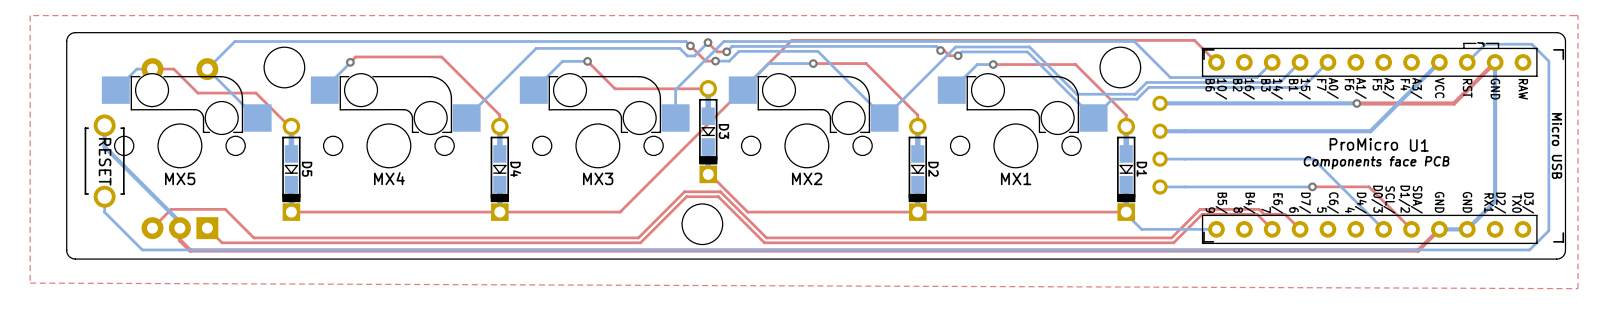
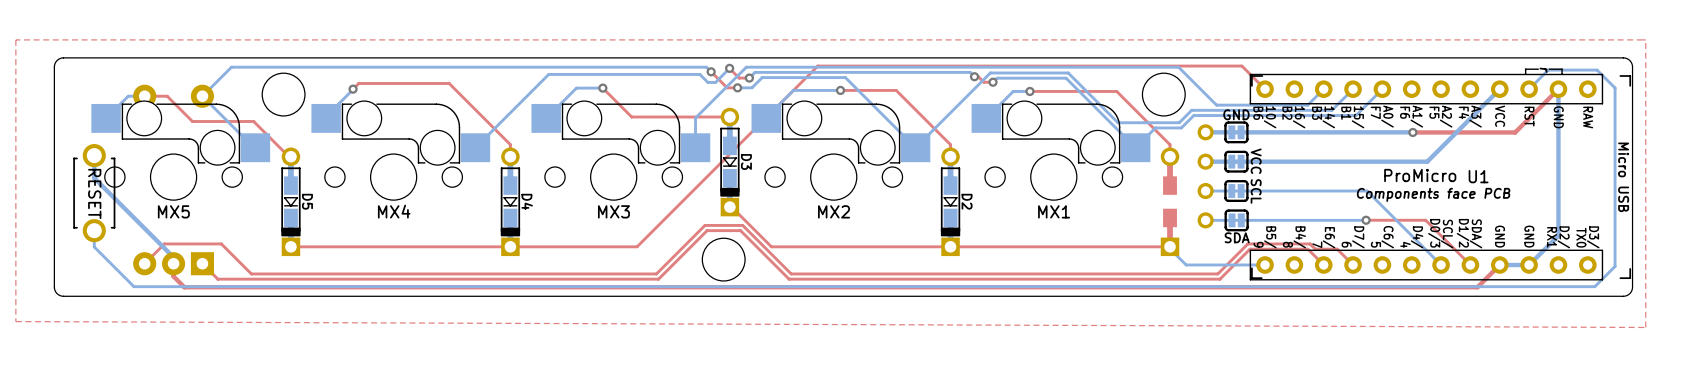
part: none -> (1236, 132)
part: none -> (1236, 161)
part: none -> (1236, 191)
D1 side: top (1126, 169) -> bottom (1170, 201)
part: none -> (1236, 220)

